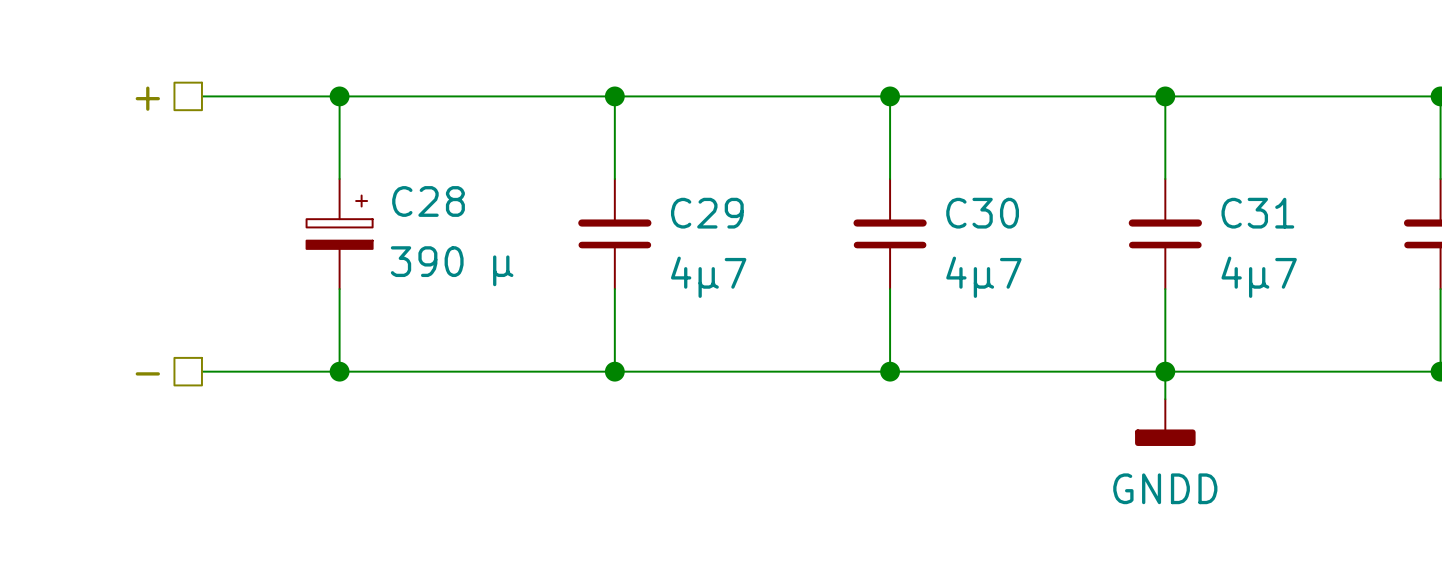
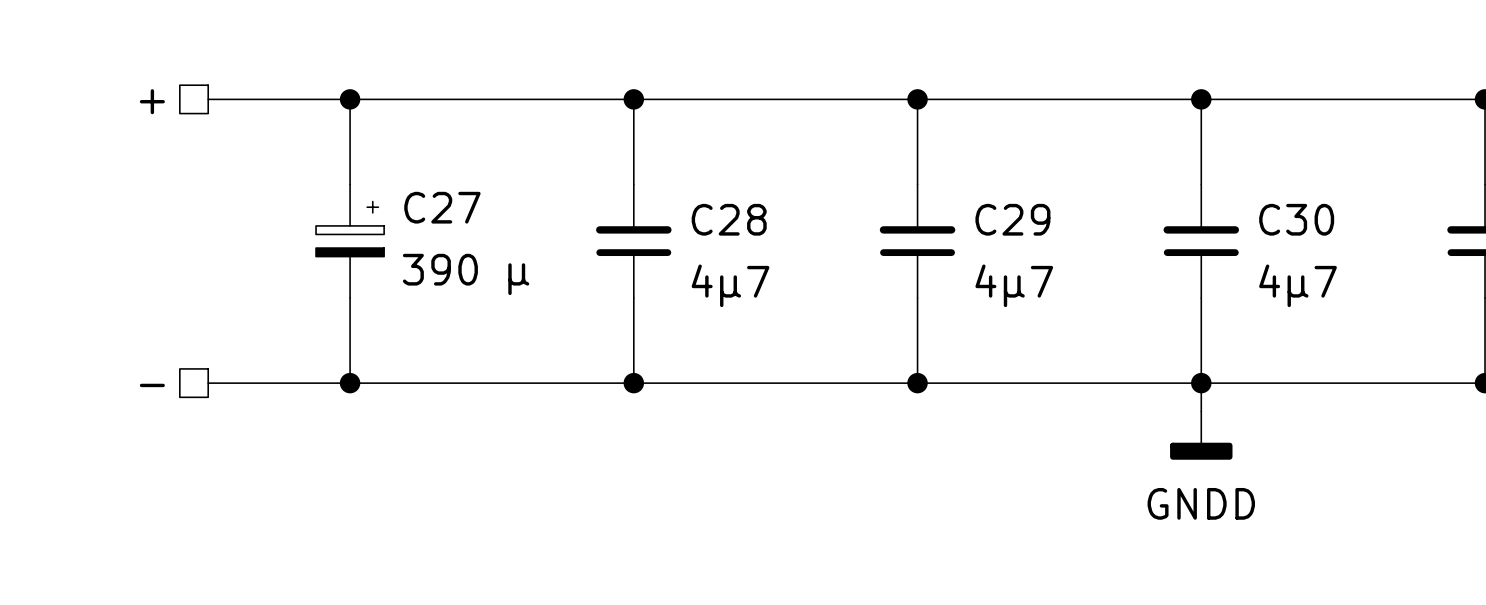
C28 name: C28 (428, 201) -> C27 (442, 207)
C29 name: C29 (707, 213) -> C28 (729, 219)
C30 name: C30 (982, 213) -> C29 (1012, 219)
C31 name: C31 (1257, 213) -> C30 (1296, 219)

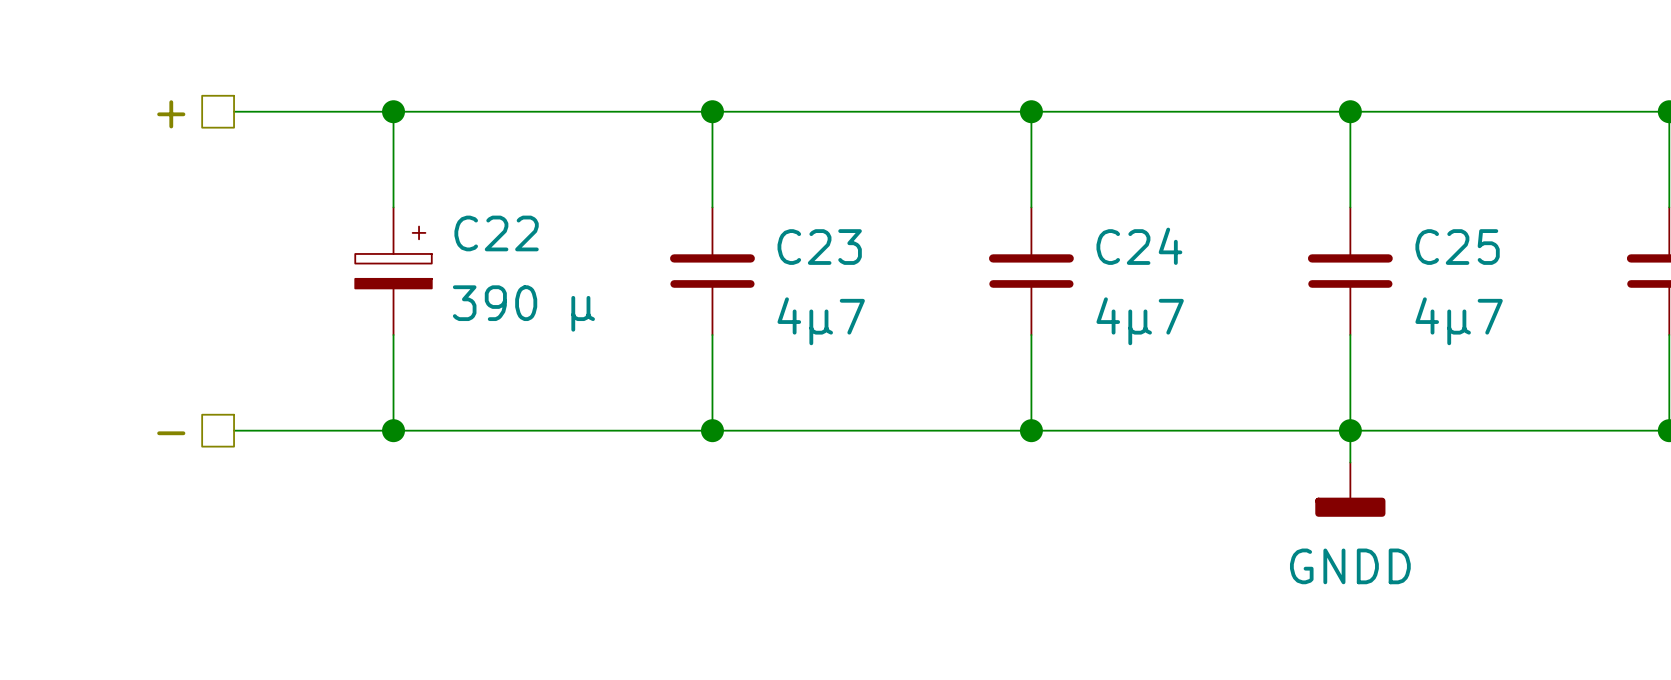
C27 name: C27 (442, 207) -> C22 (496, 233)
C28 name: C28 (729, 219) -> C23 (819, 247)
C29 name: C29 (1012, 219) -> C24 (1139, 246)
C30 name: C30 (1296, 219) -> C25 (1457, 247)

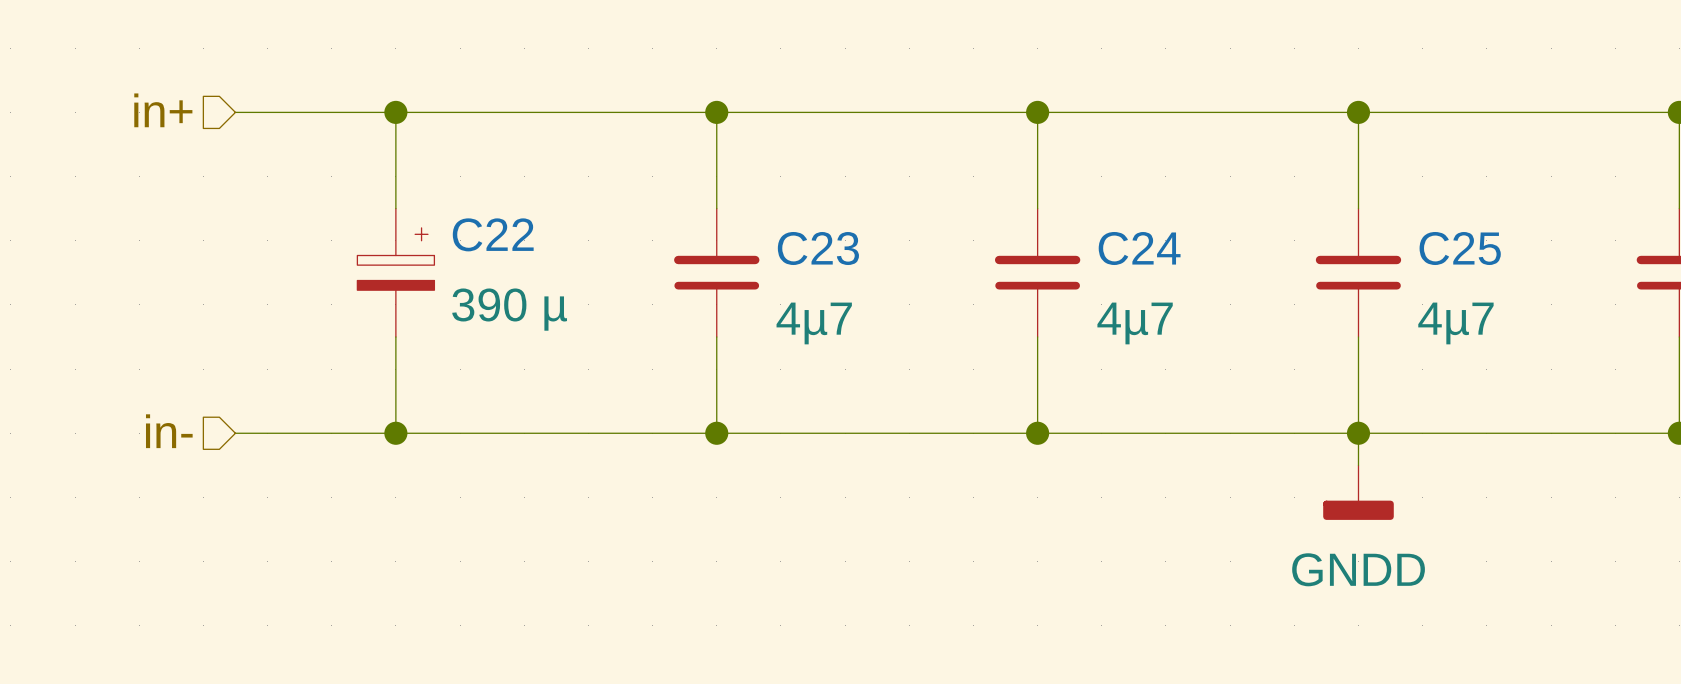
hierarchical label shape: passive (171, 114) -> input (163, 110)
hierarchical label: + (171, 114) -> in+ (163, 110)
hierarchical label shape: passive (171, 433) -> input (169, 431)
hierarchical label: - (171, 433) -> in- (169, 431)

